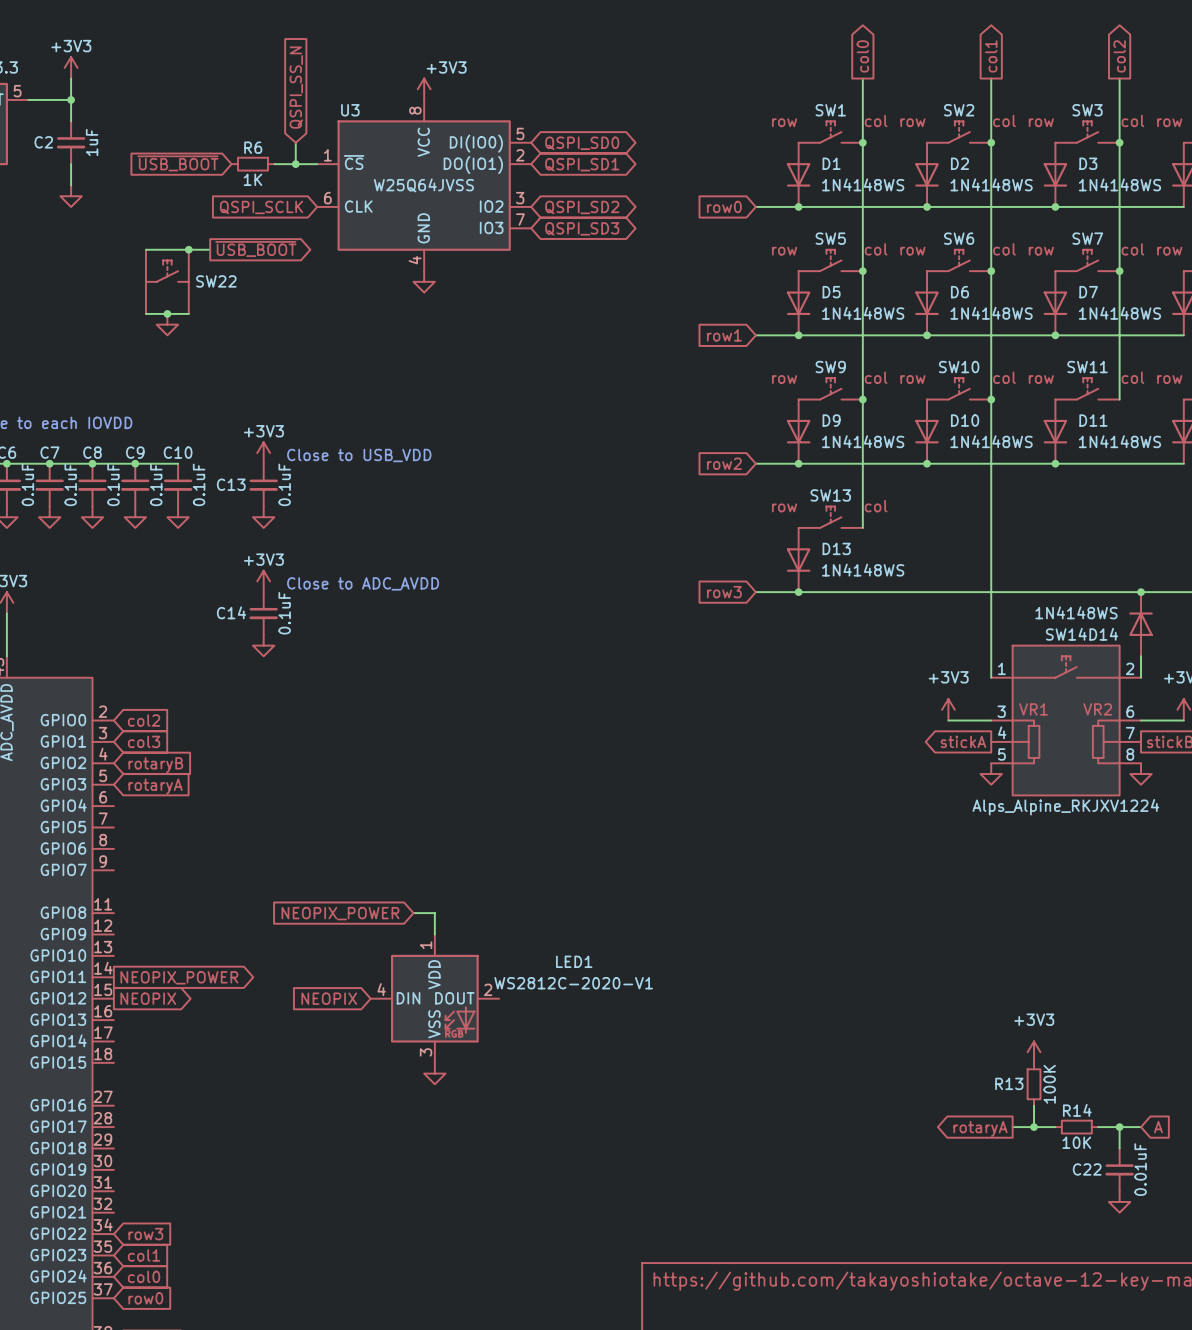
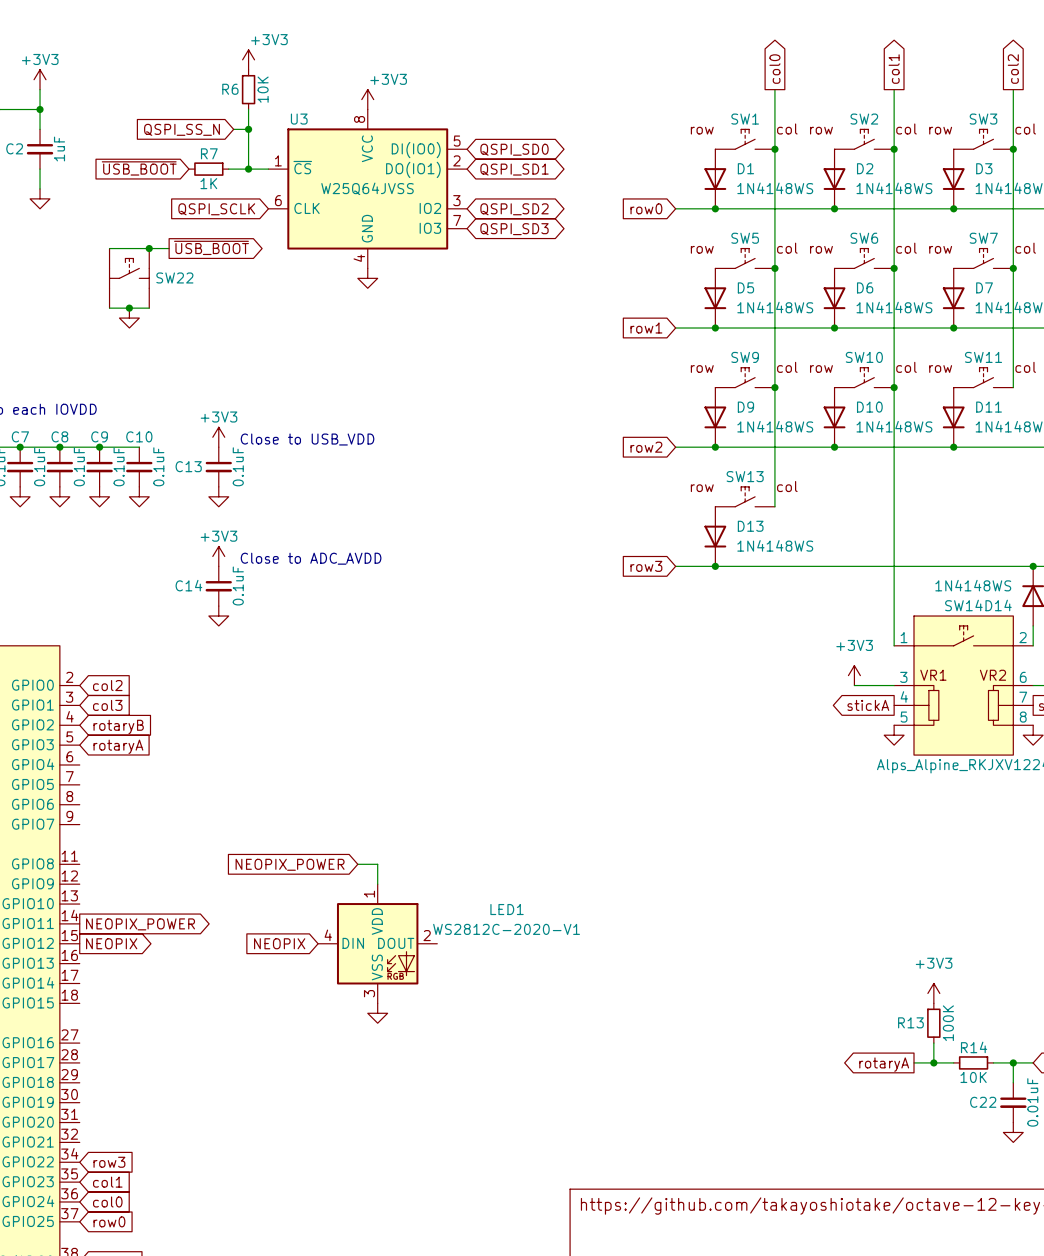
power symbol: none -> +3V3 (248, 59)
R6: none -> 10K (248, 89)
global label rotation: 0° (296, 87) -> 90° counterclockwise (181, 129)
wire: none -> (248, 109) (248, 149)
wire: none -> (233, 129) (248, 129)
junction: none -> (248, 129)
R6 name: R6 (253, 147) -> R7 (209, 153)

